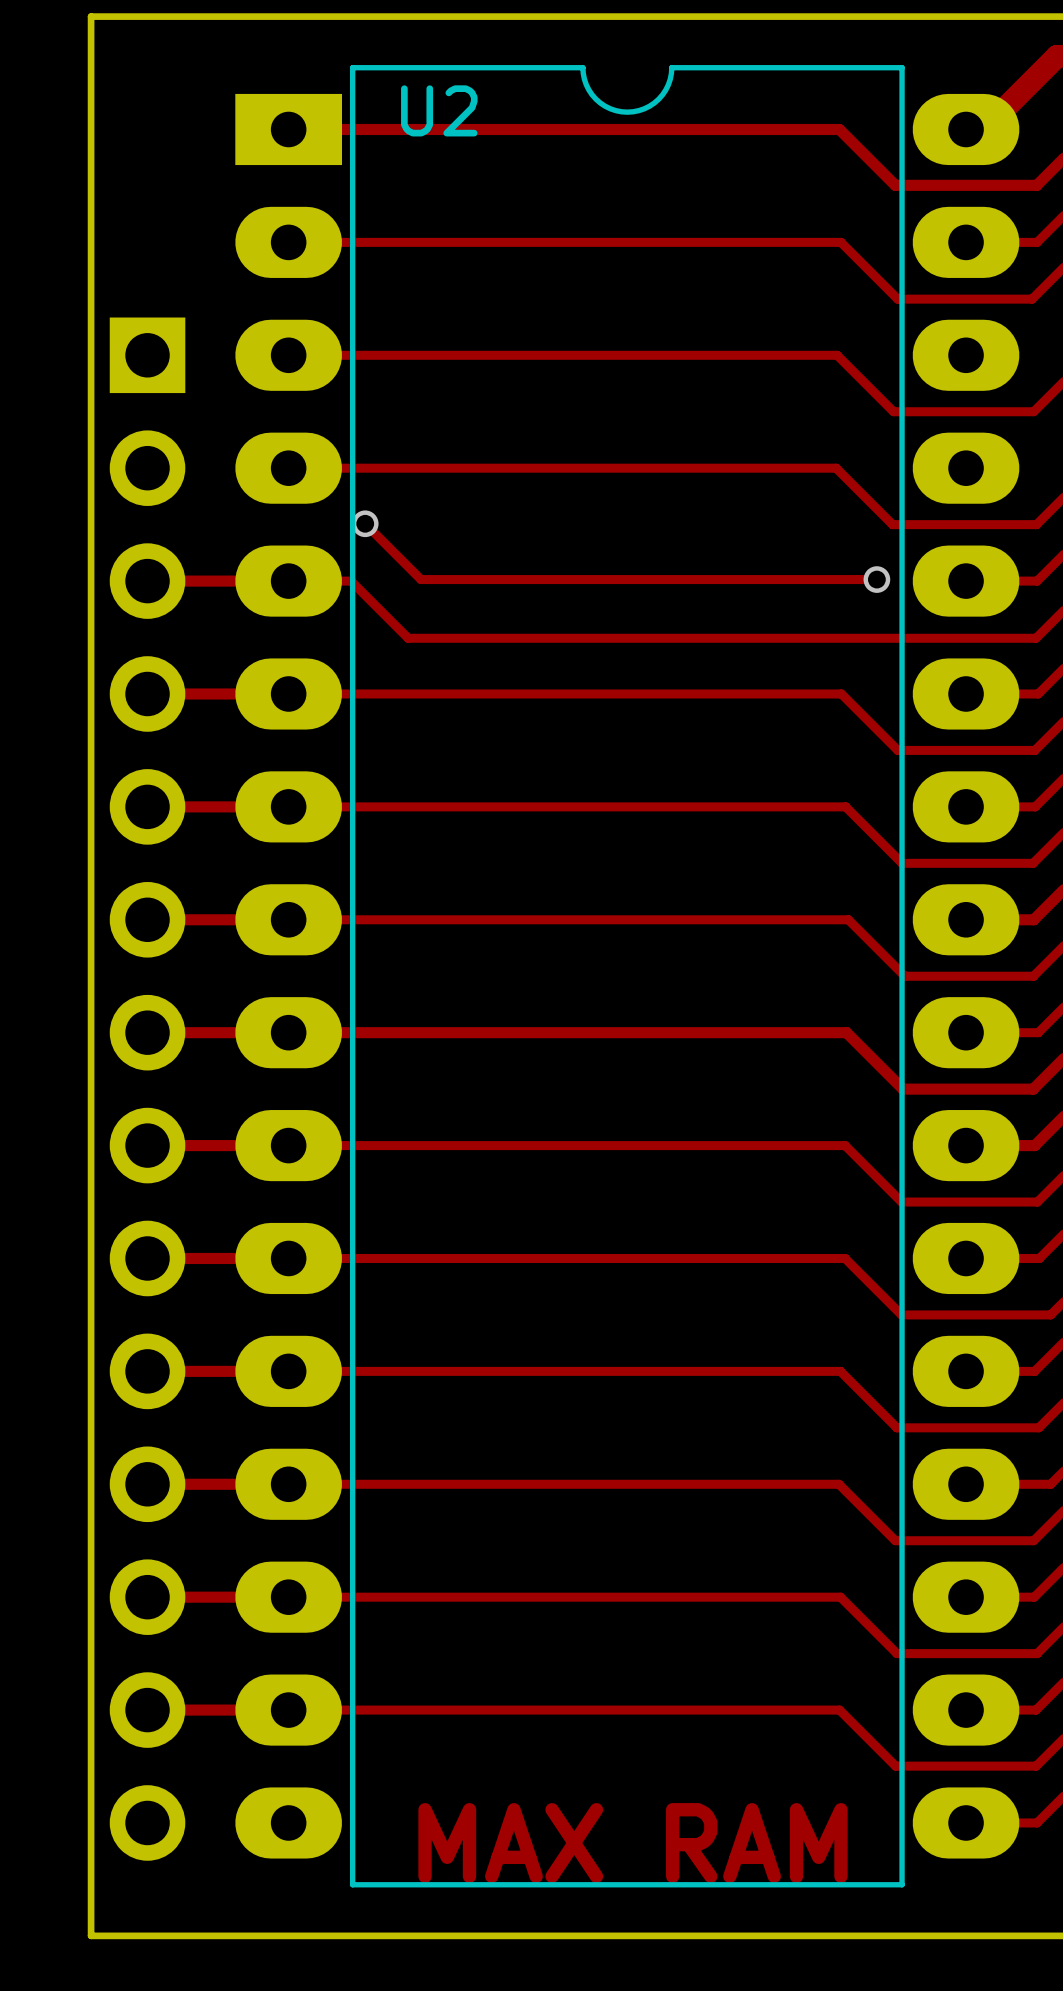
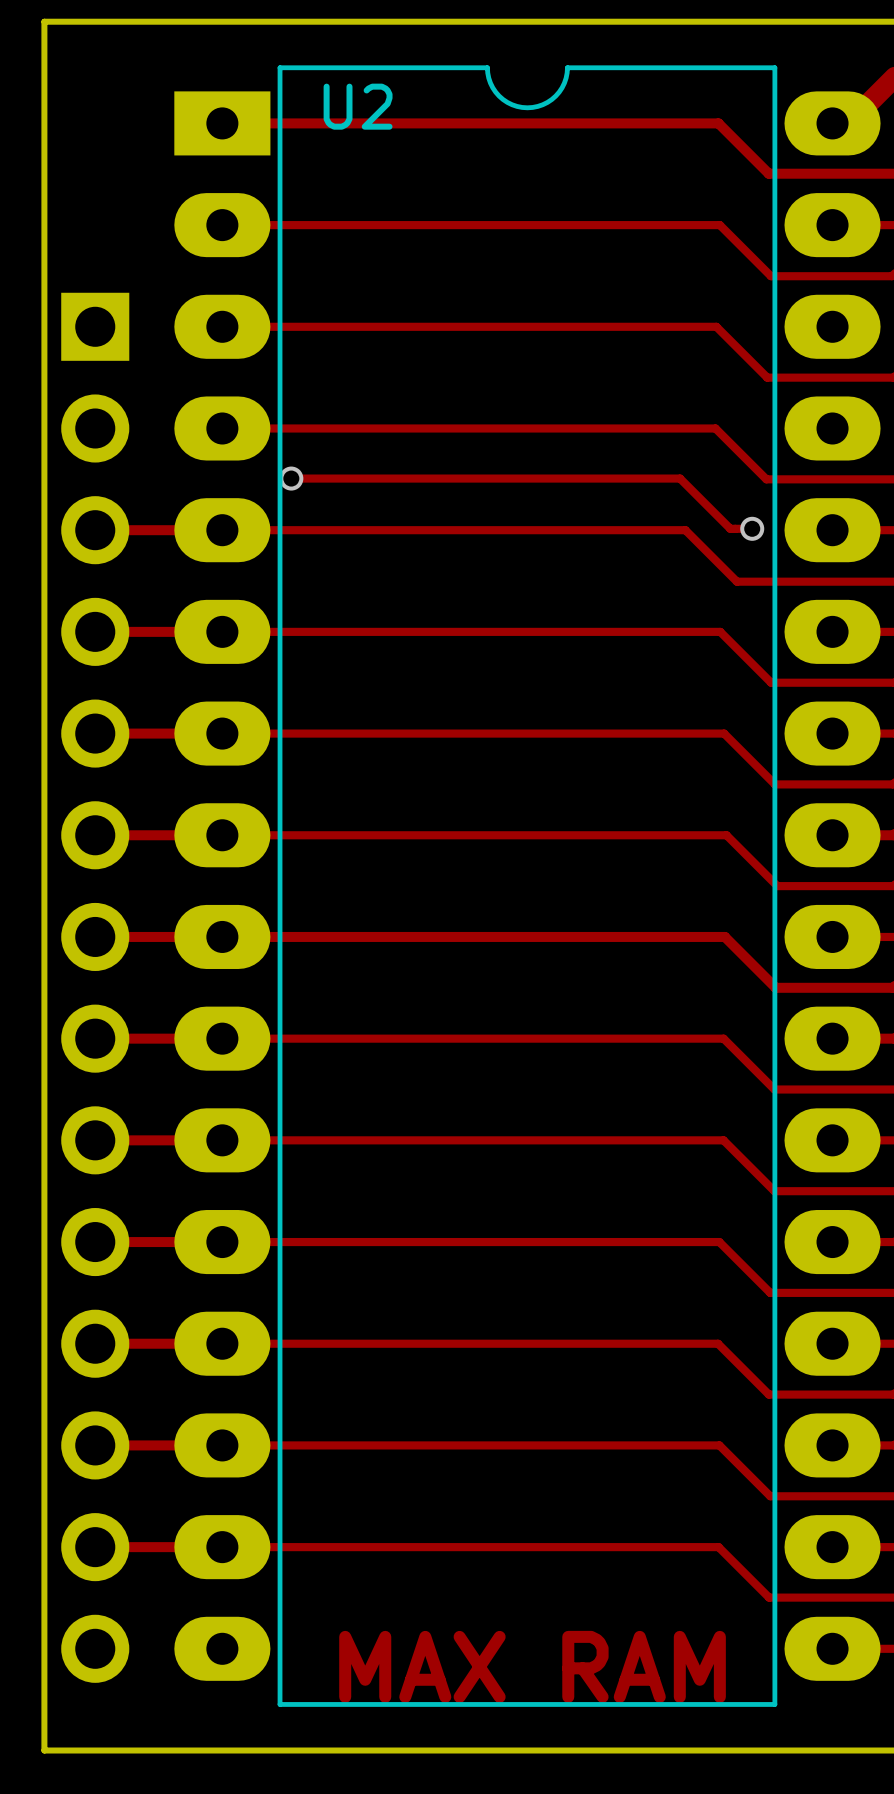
track: (365, 523) (420, 579) (852, 579) -> (291, 478) (680, 478) (730, 528)
track: (351, 581) (408, 638) (859, 638) -> (278, 530) (685, 530) (736, 581)

